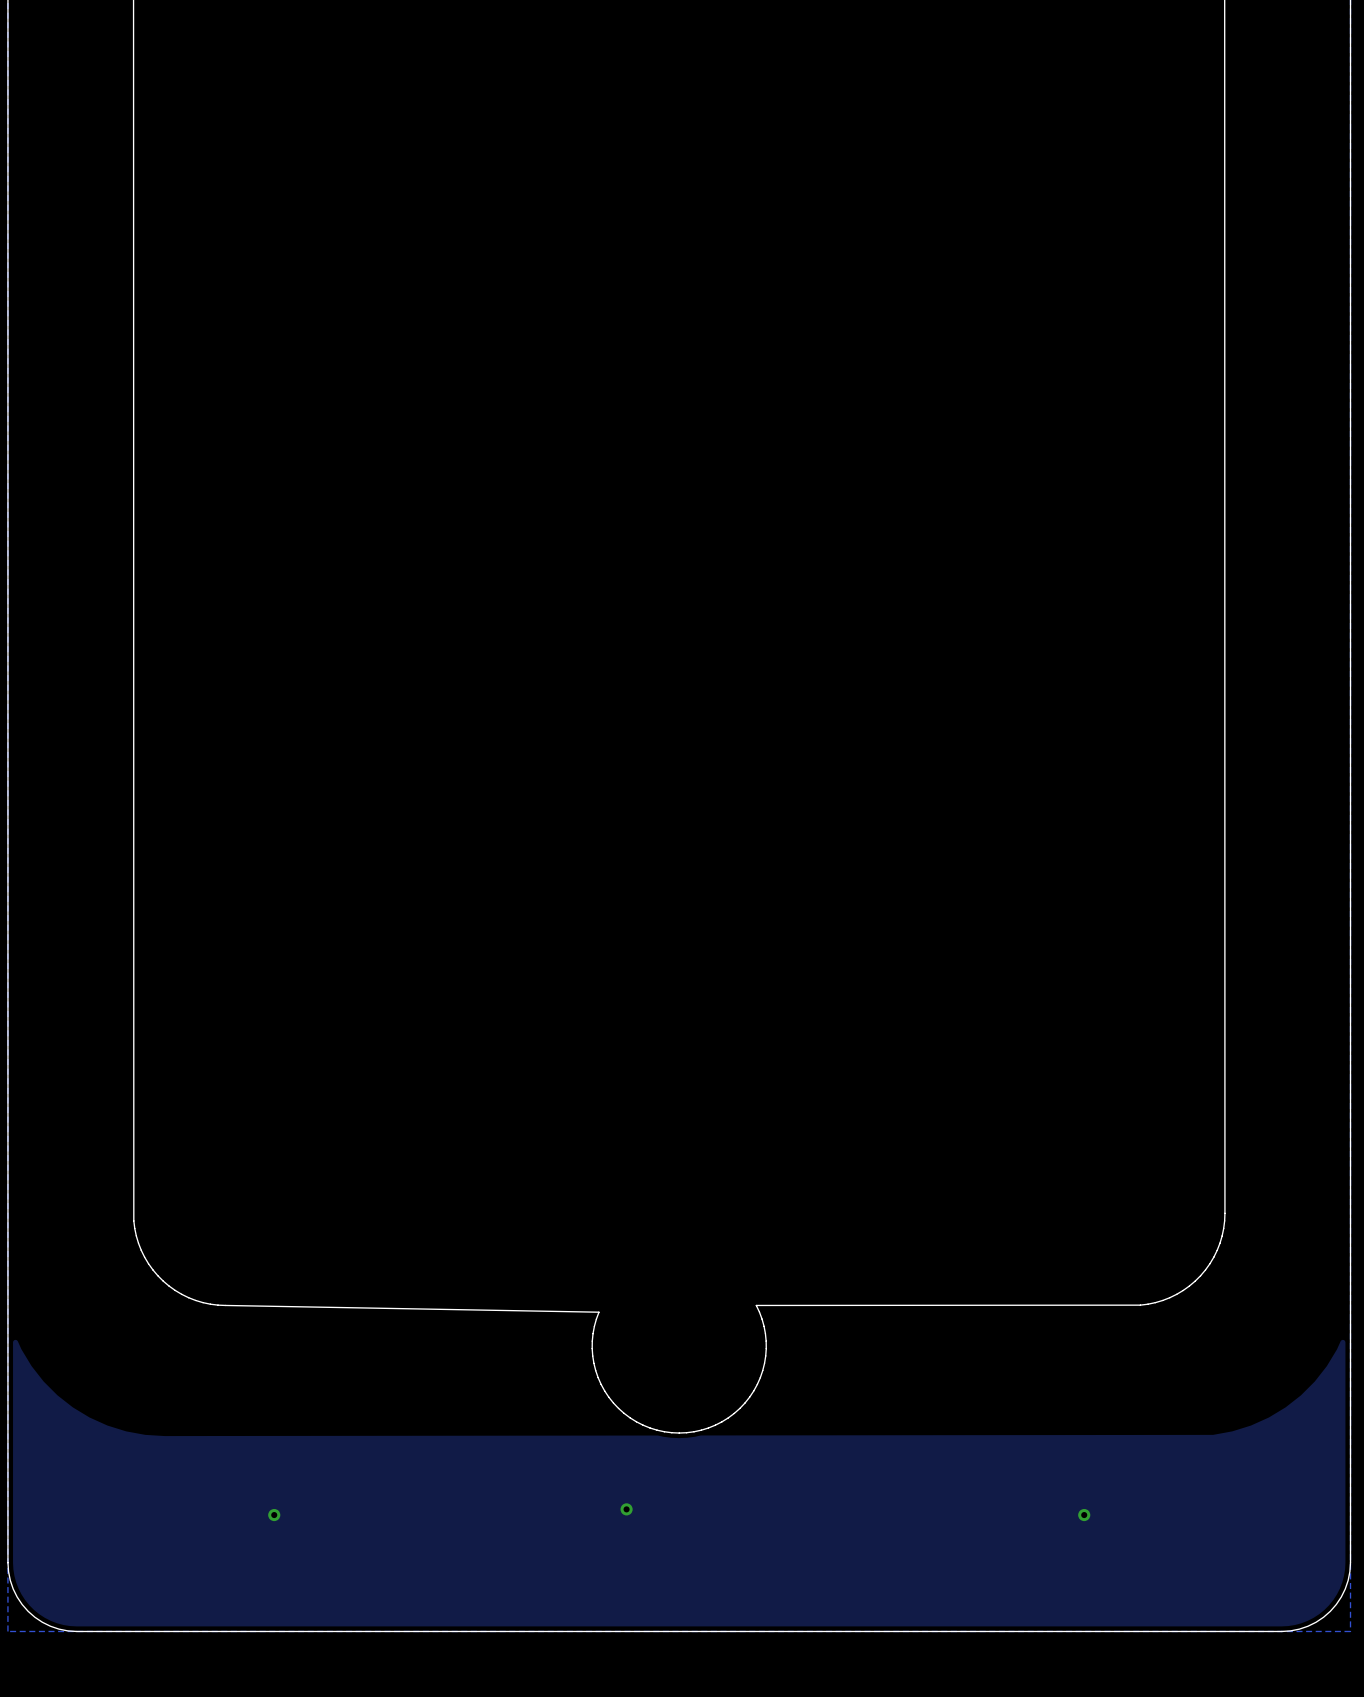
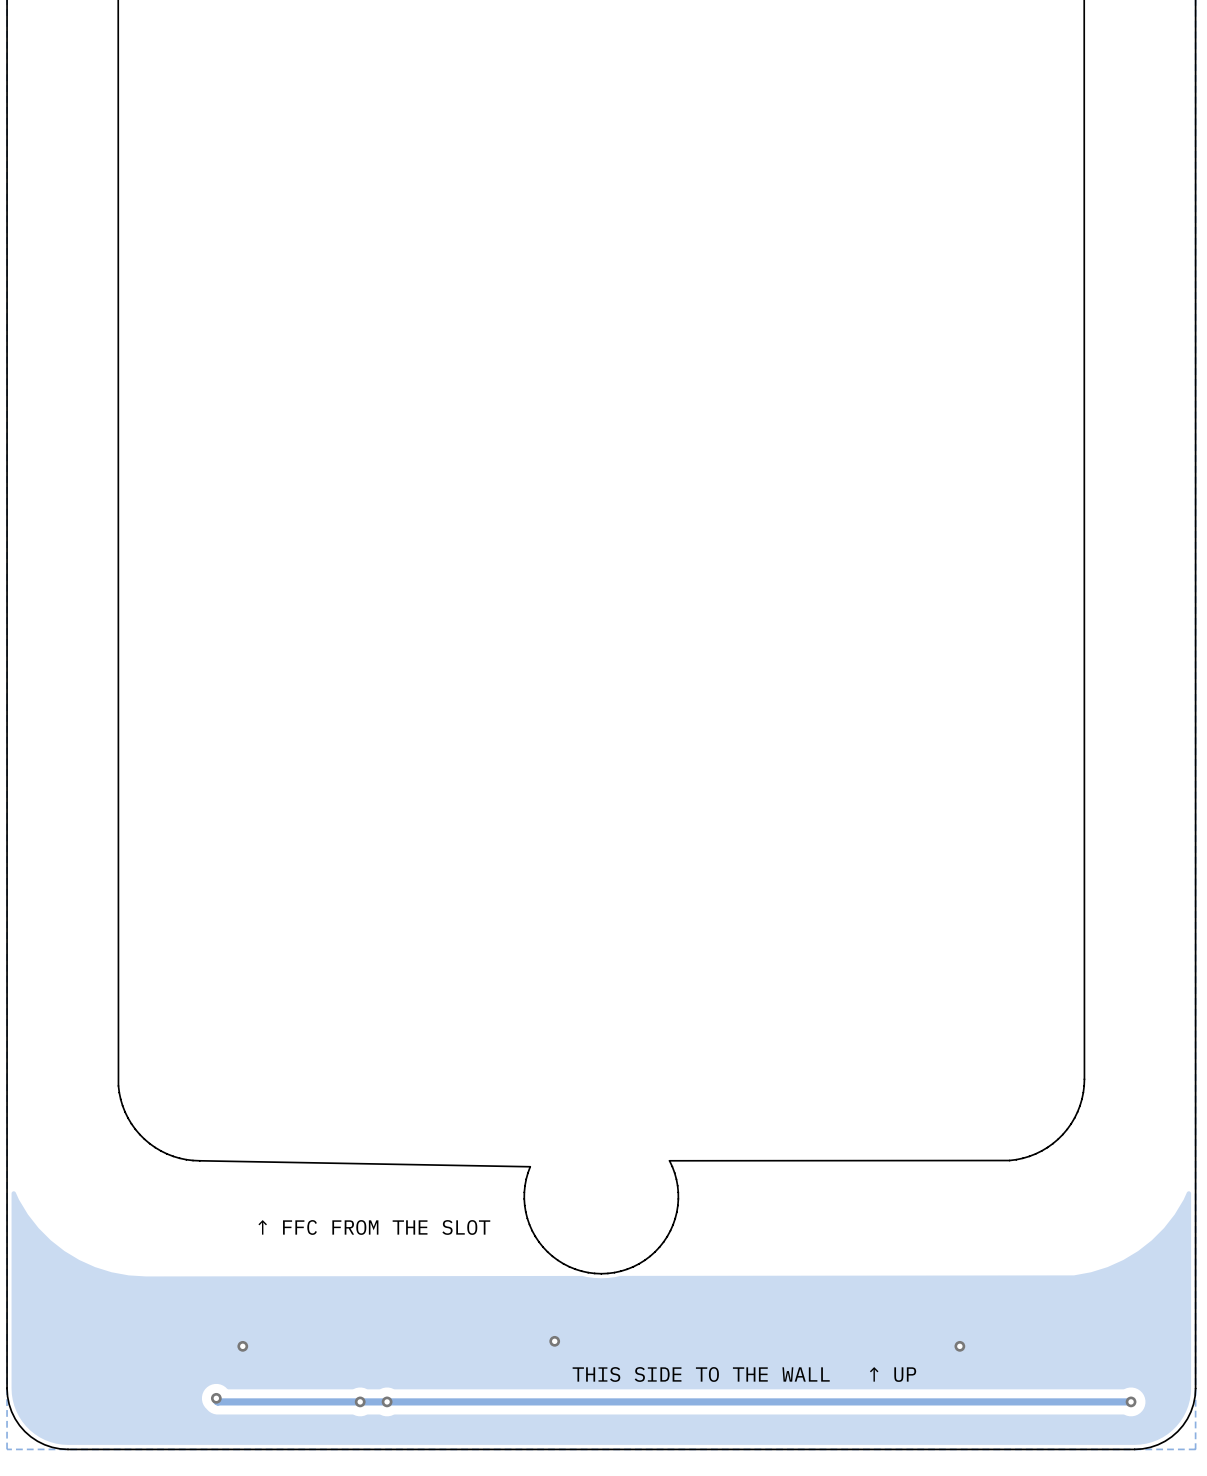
text: none -> ↑ FFC FROM THE SLOT (374, 1227)
text: none -> THIS SIDE TO THE WALL ↑ UP (744, 1374)
track: none -> (216, 1398) (217, 1401) (1131, 1401)
via: none -> (216, 1398)
via: none -> (360, 1401)
via: none -> (387, 1401)
via: none -> (1131, 1401)

